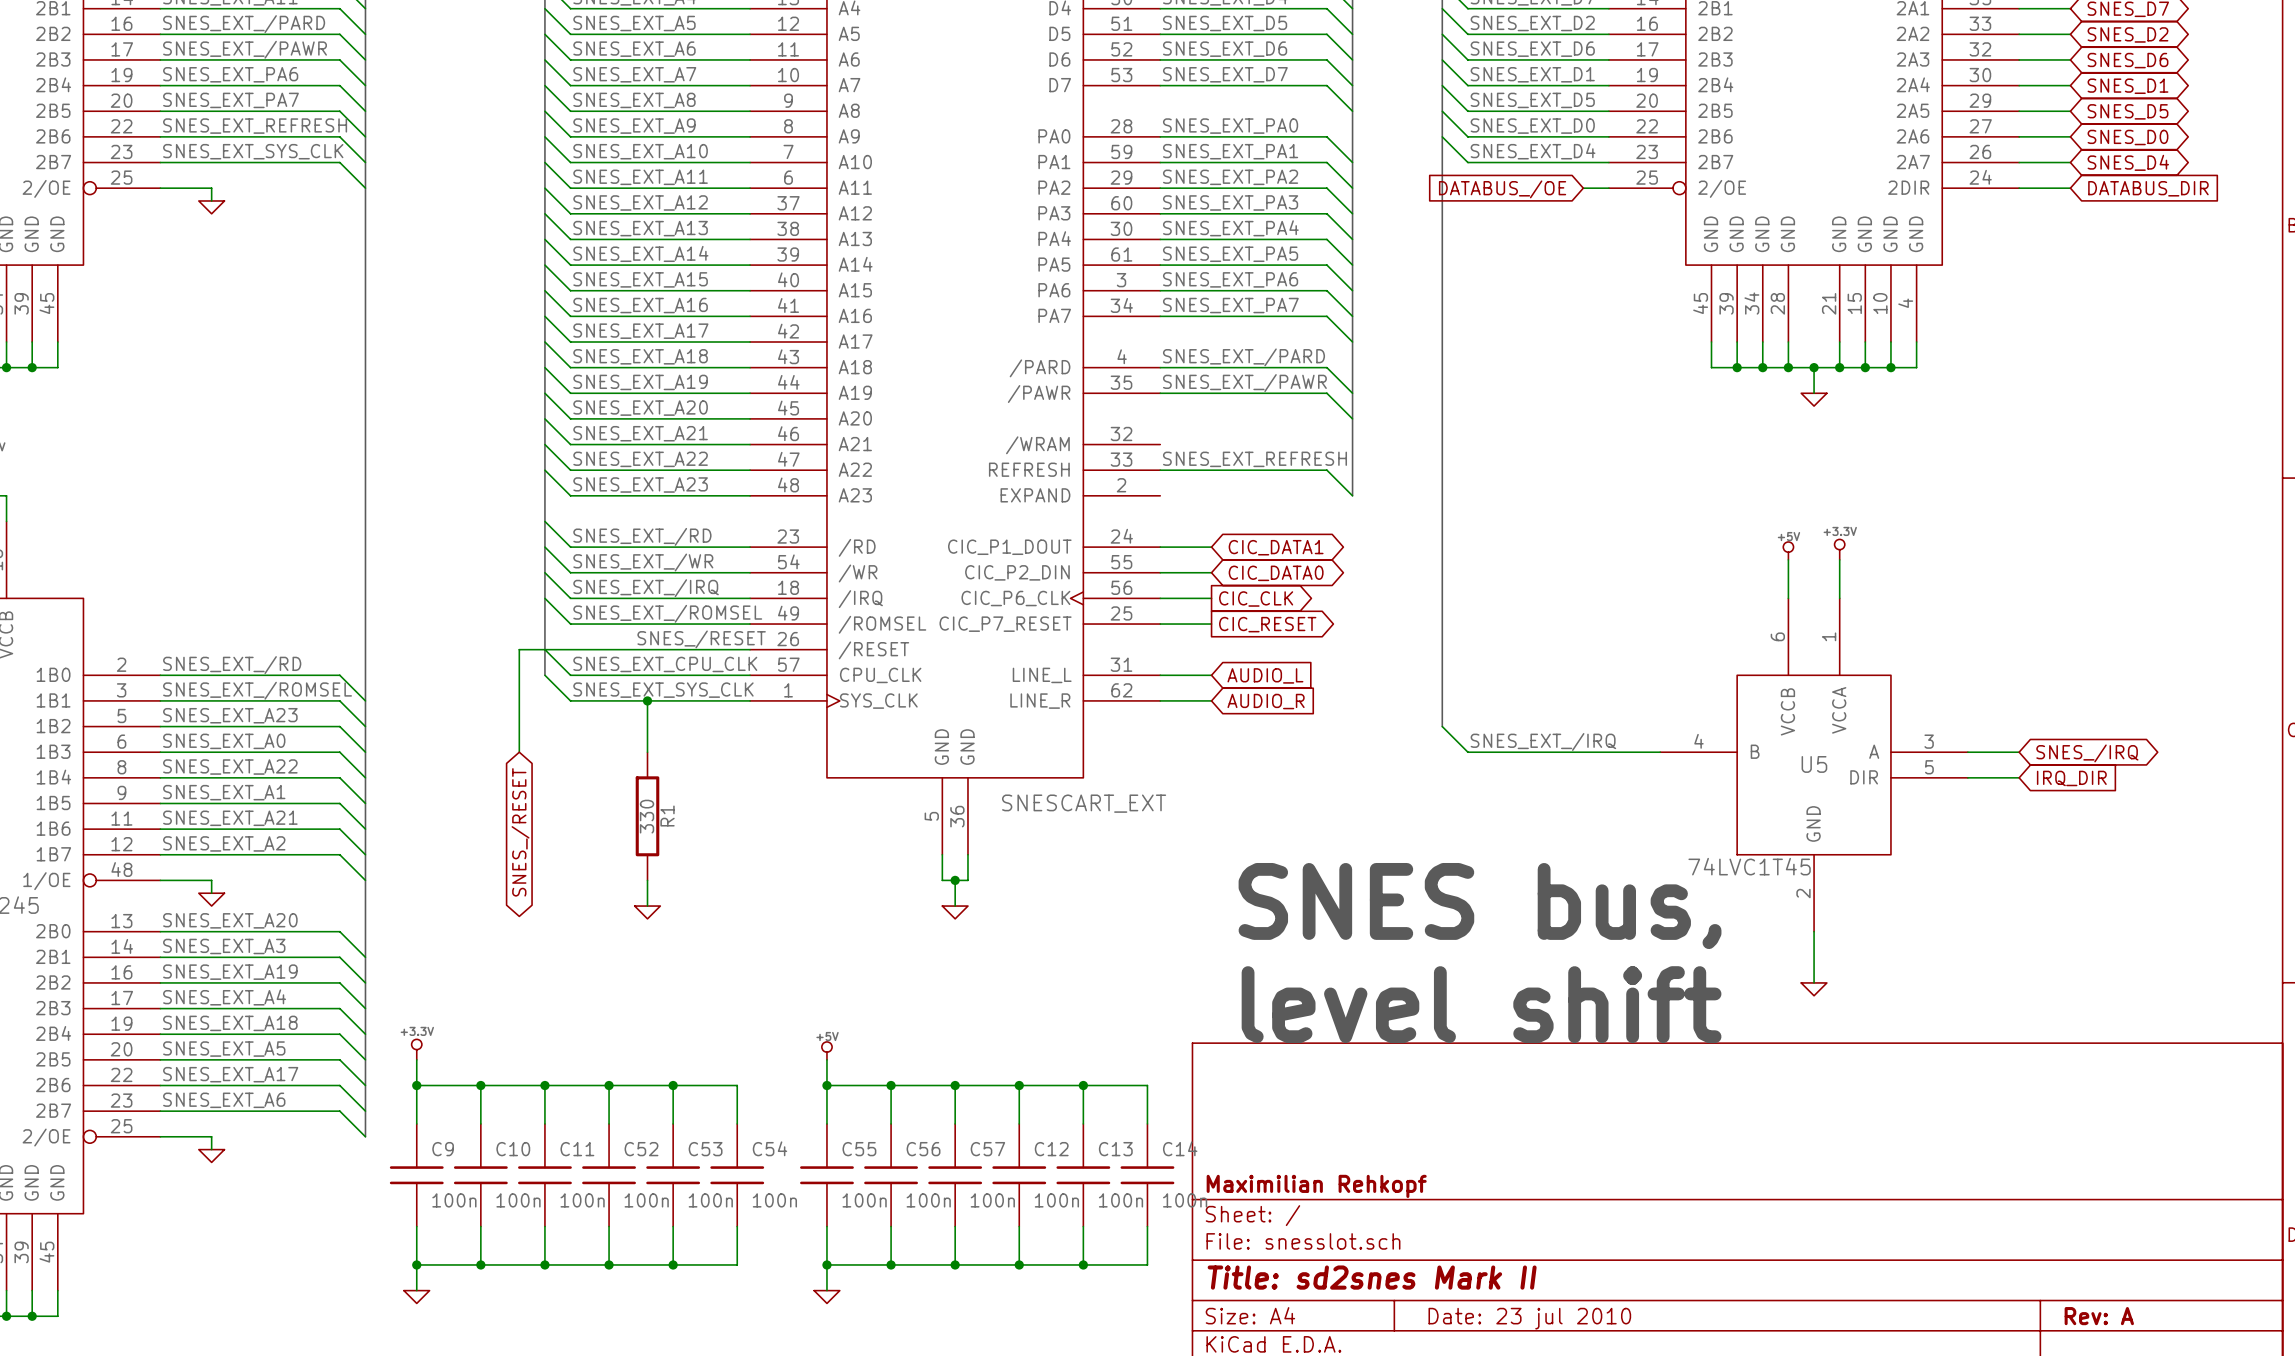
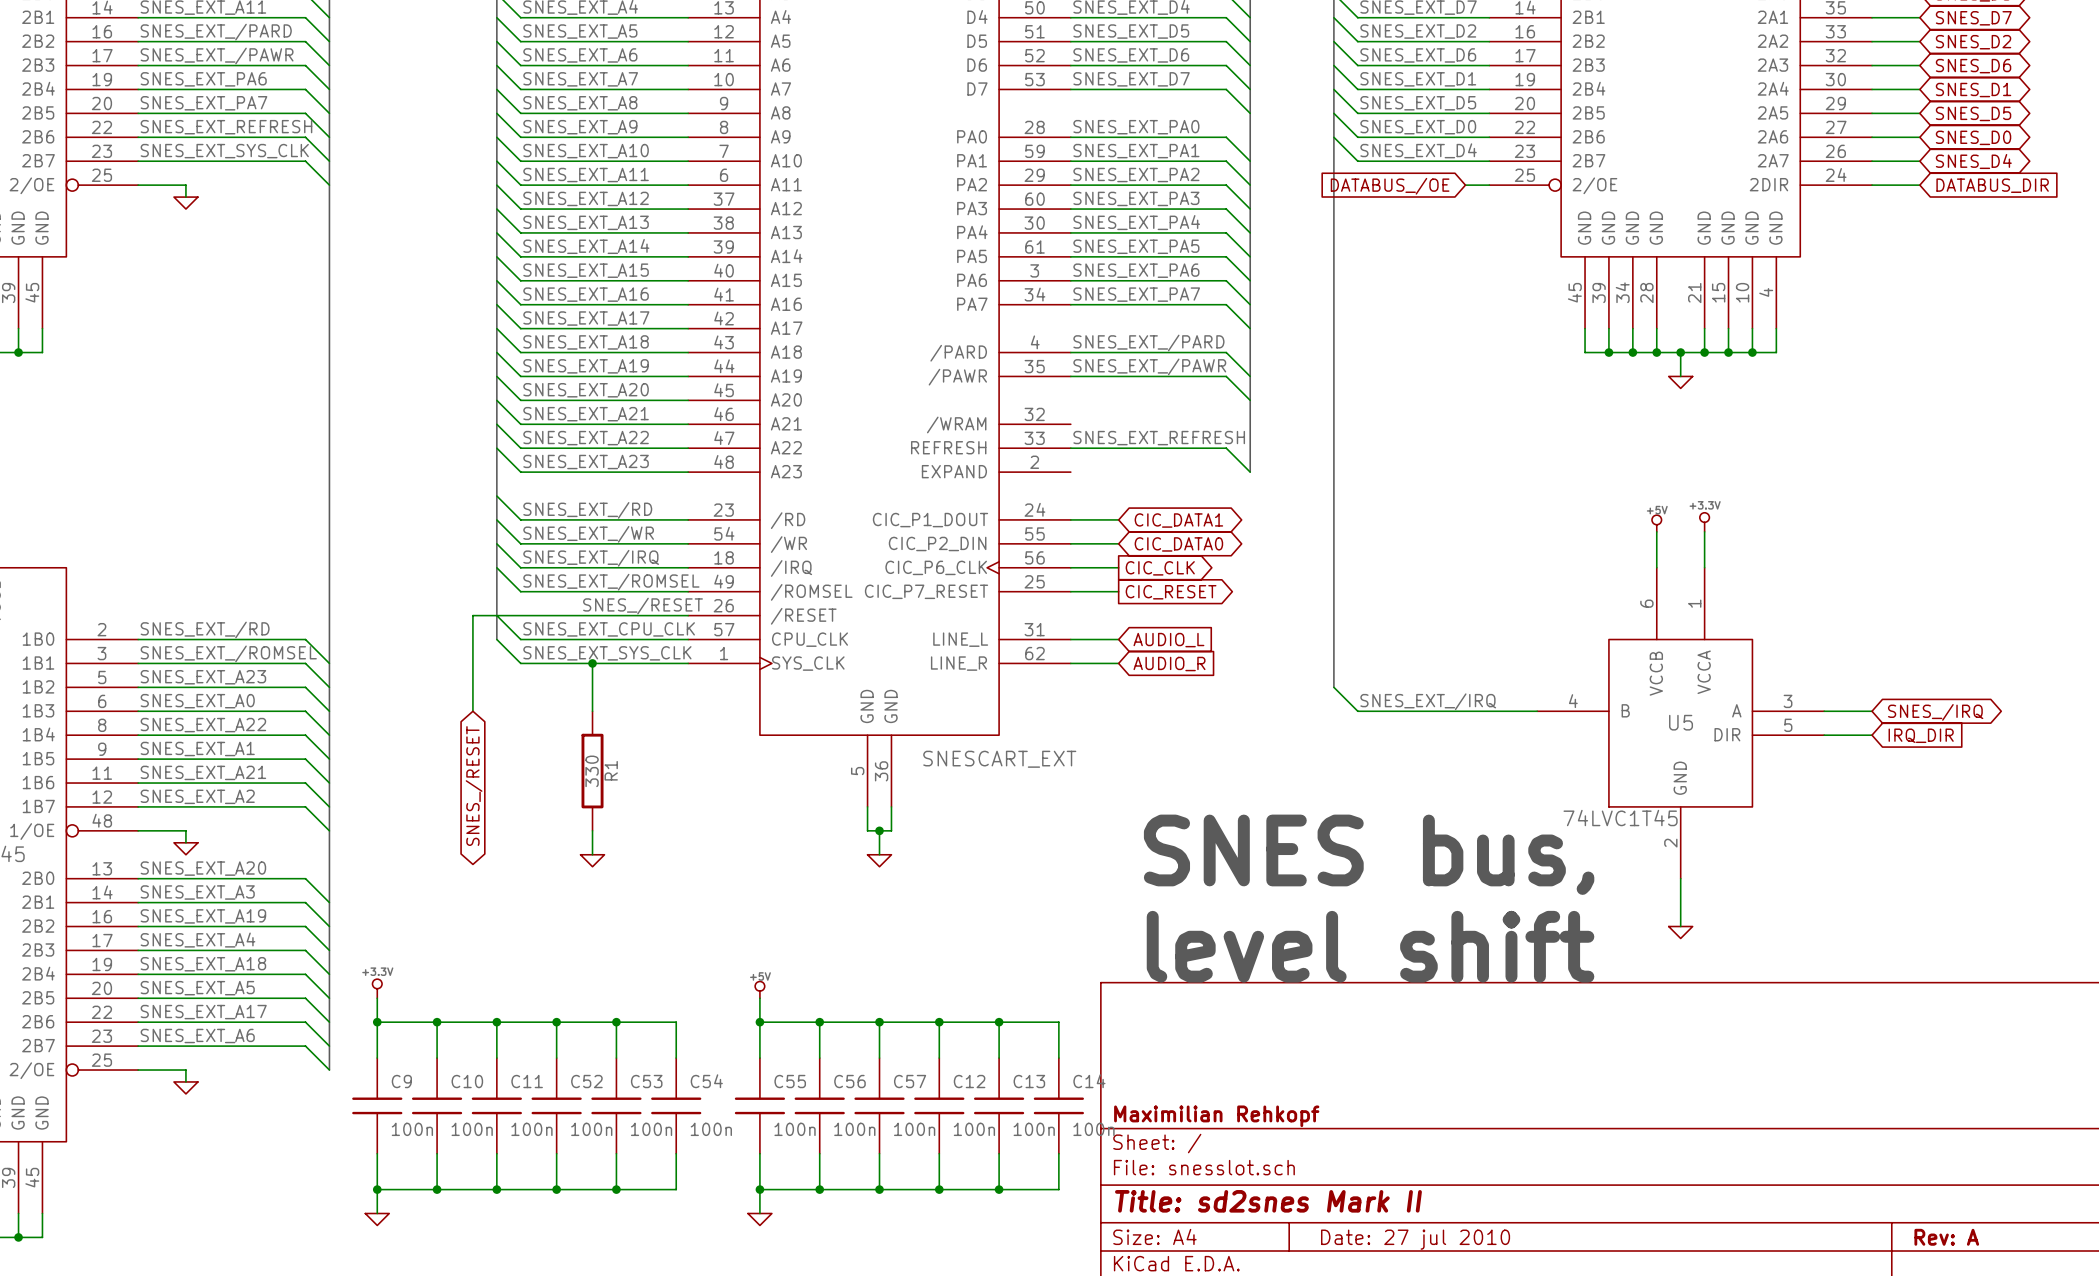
title block: Date: 23 jul 2010 (1529, 1318) -> Date: 27 jul 2010 (1415, 1239)

